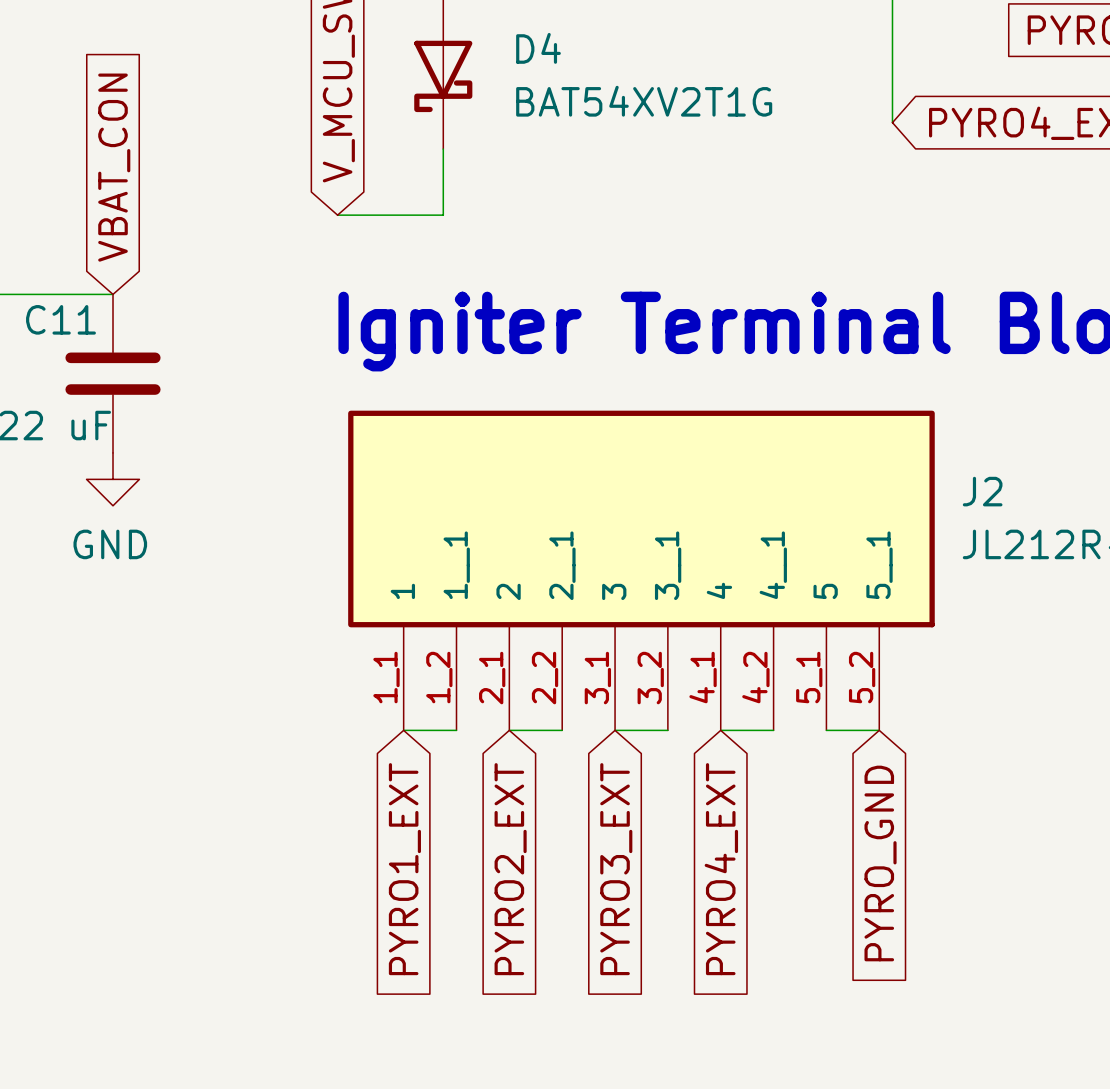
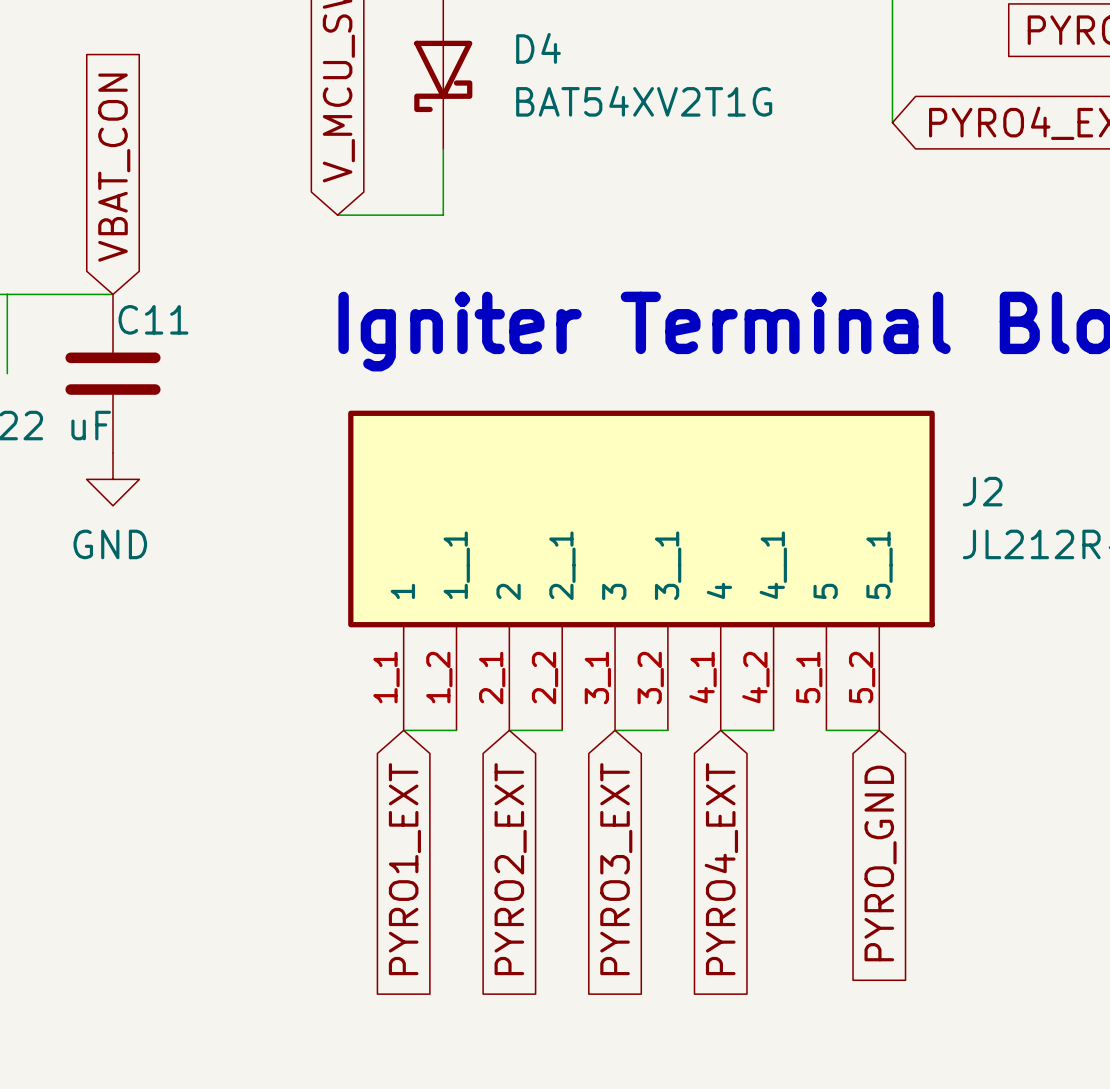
wire: none -> (7, 294) (7, 373)
C11 name position: C11 (60, 319) -> C11 (153, 319)

